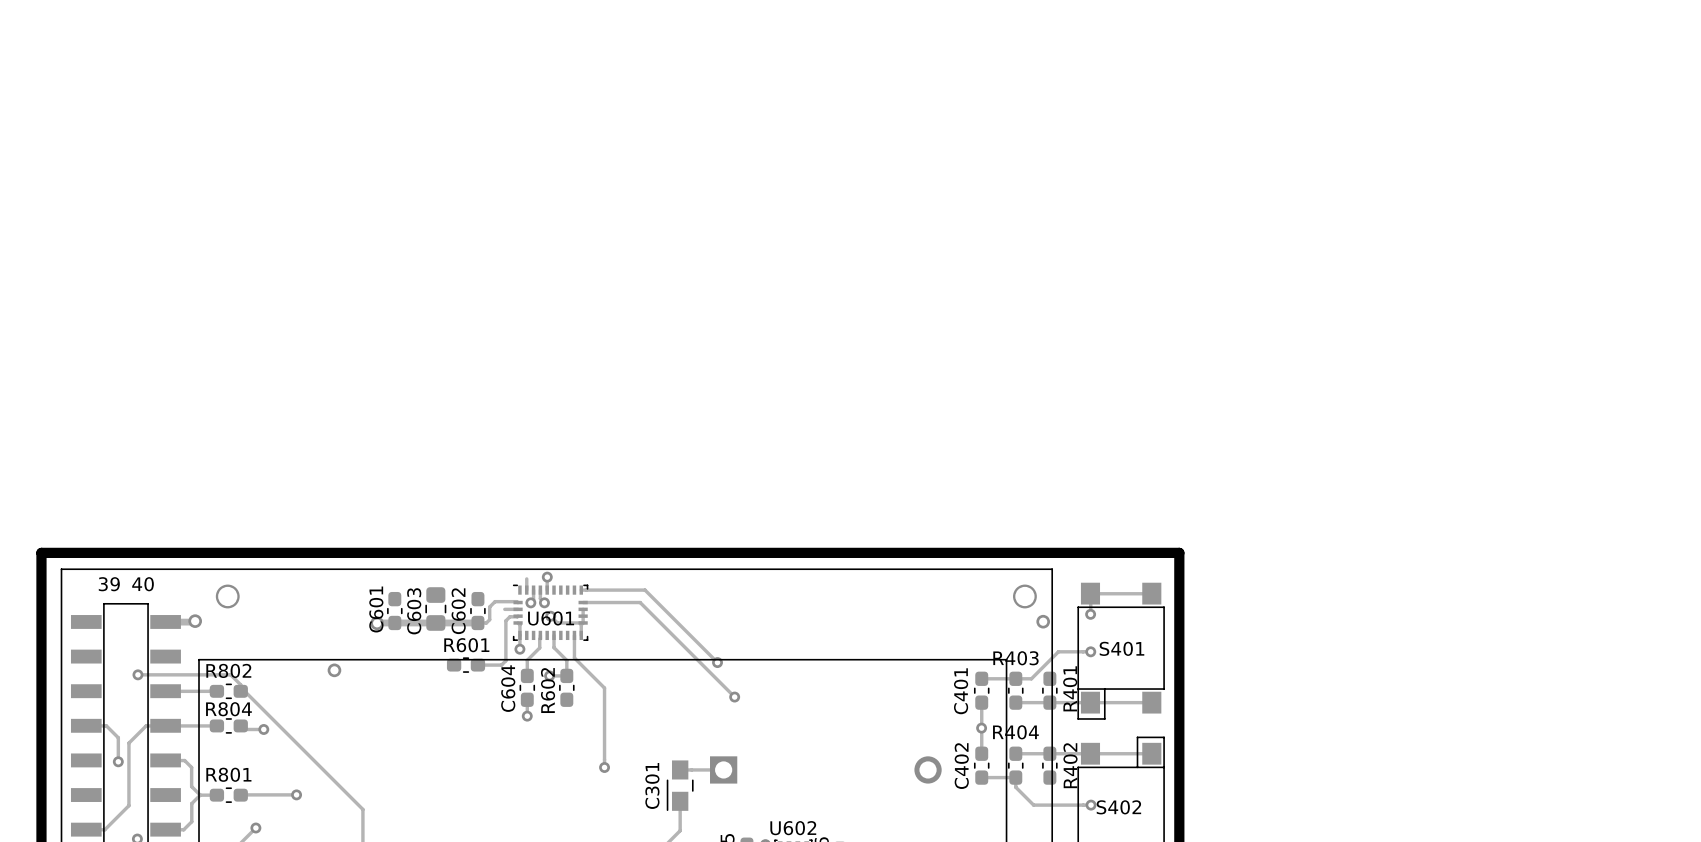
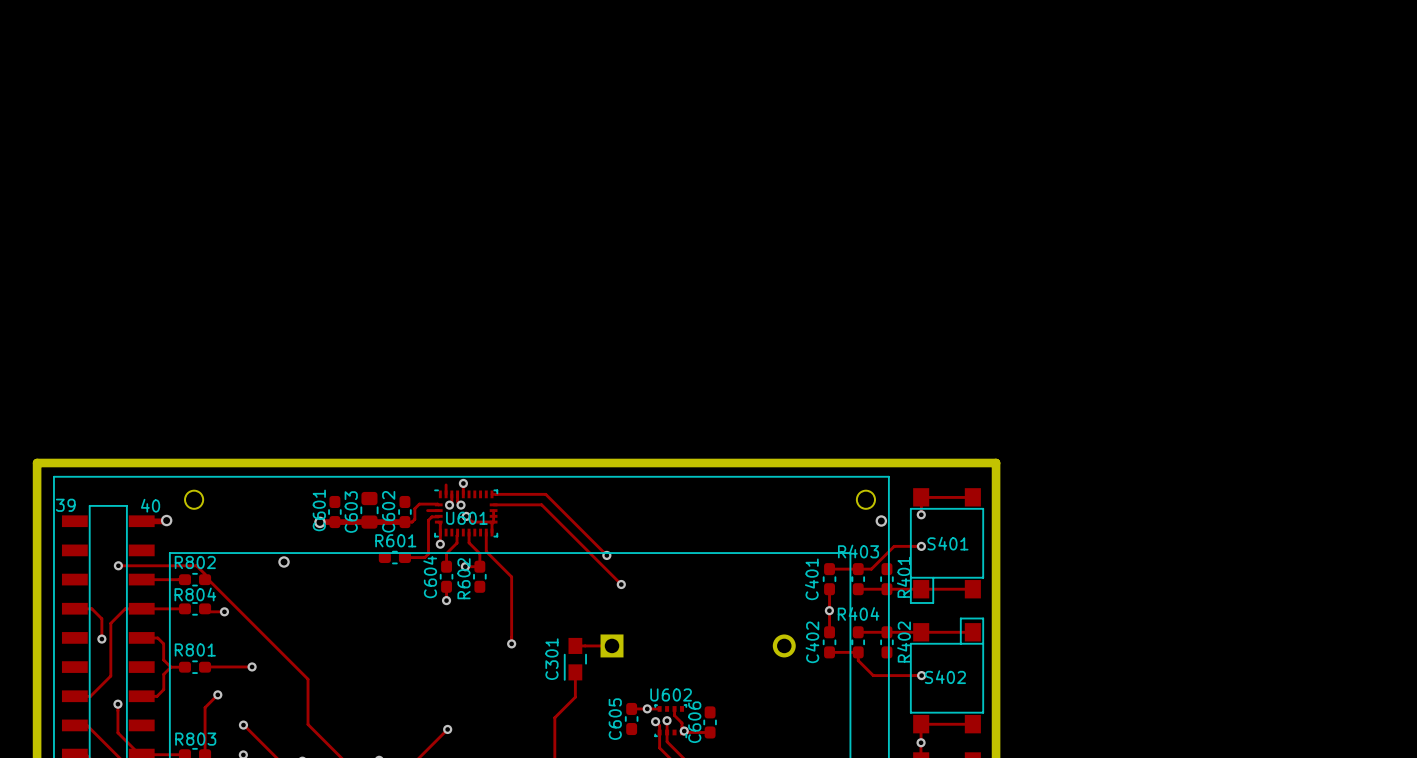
part text position: 39 (109, 584) -> 39 (65, 505)
part text position: 40 (143, 584) -> 40 (150, 505)

